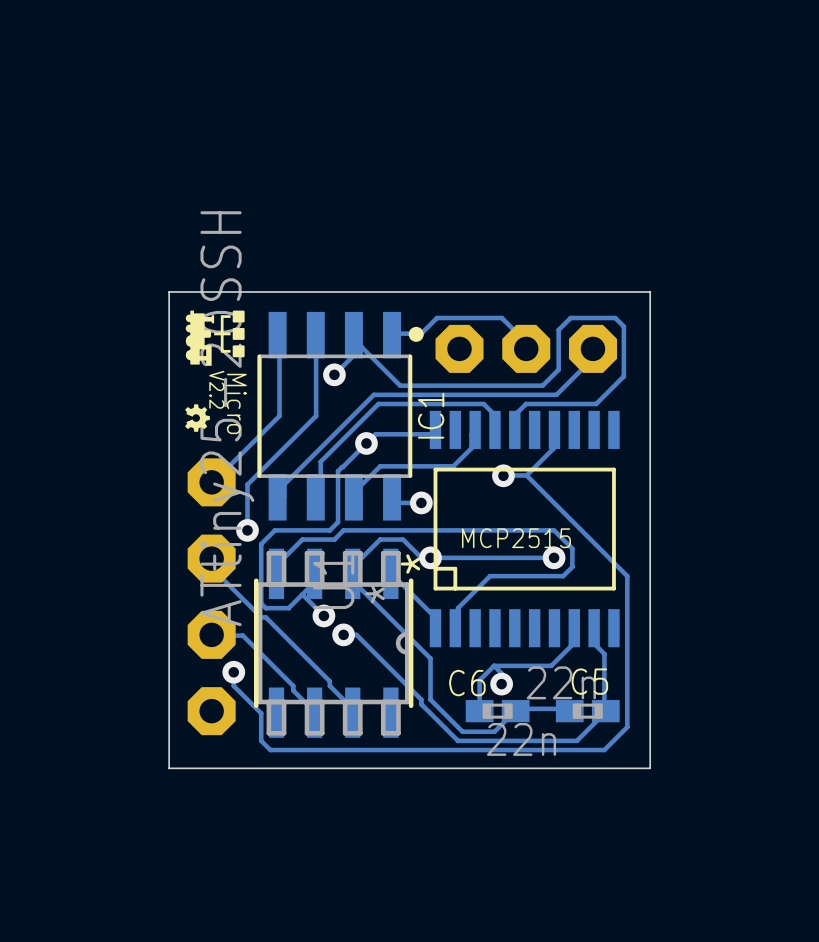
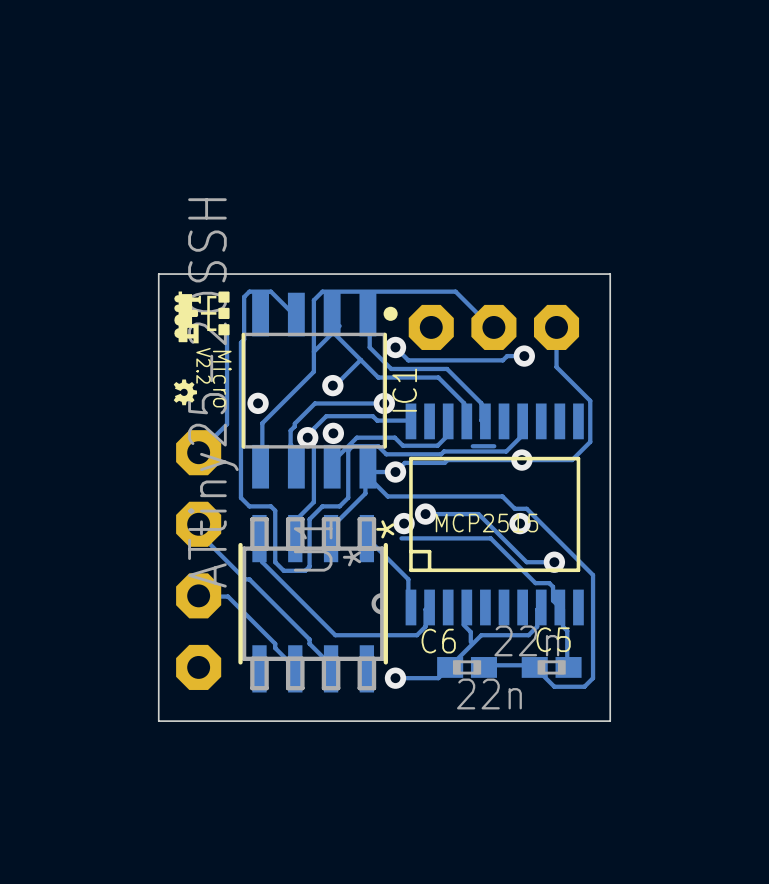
track: (277, 335) (279, 351) (279, 416) (211, 482) -> (227, 330) (227, 424) (198, 452)
track: (316, 335) (316, 416) (247, 484) (247, 530) -> none
track: (392, 335) (421, 333) (437, 318) (501, 318) (523, 339) (526, 348) -> (259, 475) (262, 472) (262, 423) (313, 371) (313, 300) (322, 291) (455, 291) (489, 326) (493, 327)
track: none -> (294, 322) (292, 321) (292, 313) (270, 291) (249, 291) (244, 296) (244, 339) (240, 342) (240, 497) (249, 506) (270, 506) (275, 510) (275, 562) (283, 570) (305, 570) (309, 566) (309, 519) (322, 506) (339, 506) (348, 497) (348, 450) (352, 446) (378, 446) (386, 454) (506, 451) (522, 435) (522, 421)
track: none -> (330, 322) (326, 326) (378, 377) (438, 377) (464, 403) (464, 420) (466, 421)
track: (358, 344) (353, 335) (351, 336) (400, 385) (542, 385) (558, 369) (558, 329) (570, 318) (615, 318) (623, 326) (623, 376) (596, 403) (526, 403) (517, 412) (517, 429) (514, 429) -> none
track: none -> (366, 322) (369, 326) (369, 347) (391, 368) (447, 368) (481, 403) (481, 420) (485, 421)
track: (592, 358) (556, 394) (373, 394) (284, 484) (284, 497) (277, 497) -> (556, 336) (556, 367) (590, 400) (590, 441) (572, 460) (447, 460) (444, 462) (404, 462) (393, 475)
track: none -> (395, 347) (408, 360) (502, 360) (507, 356) (524, 356)
via: none -> (395, 347)
via: (334, 374) -> none
via: none -> (524, 356)
track: none -> (360, 359) (335, 385) (332, 385)
via: none -> (332, 385)
via: none -> (258, 403)
track: none -> (384, 403) (314, 403) (294, 423) (290, 430) (290, 444) (294, 448) (294, 475)
via: none -> (384, 403)
track: (435, 429) (435, 434) (375, 434) (338, 471) (338, 522) (329, 530) (274, 530) (261, 544) (261, 603) (265, 608) (288, 608) (311, 585) (311, 576) (314, 573) -> (410, 421) (377, 420) (372, 416) (326, 416) (313, 428) (313, 502) (296, 519) (295, 538)
track: (475, 429) (471, 434) (471, 448) (453, 466) (420, 466) -> (448, 421) (447, 436) (437, 445) (402, 445) (394, 437)
track: (494, 429) (494, 414) (483, 403) (378, 403) (320, 461) (320, 497) (315, 497) -> none
track: (554, 429) (554, 448) (526, 475) (627, 576) (627, 727) -> none
via position: (366, 443) -> (333, 433)
via: none -> (307, 437)
via: (503, 475) -> none
via: none -> (521, 460)
part position: (524, 529) -> (494, 514)
via: (247, 530) -> none
track: none -> (425, 514) (478, 514) (526, 562) (554, 562)
via: none -> (425, 514)
track: (554, 557) (421, 557) (403, 539) (380, 539) (352, 567) -> (588, 682) (593, 678) (593, 575) (526, 508) (514, 508) (502, 496) (387, 496) (366, 475) (365, 493) (331, 527) (331, 532)
track: (276, 573) (279, 571) (279, 562) (302, 539) (334, 539) (343, 530) (554, 530) (572, 548) (572, 567) (563, 576) (490, 576) (457, 608) (457, 626) (455, 628) -> (259, 538) (262, 540) (262, 562) (335, 635) (416, 635) (425, 626) (425, 609) (429, 607)
track: (352, 573) (352, 580) (430, 658) (430, 699) (462, 731) (494, 731) (515, 711) -> none
track: (302, 594) (323, 615) -> none
via: none -> (554, 562)
via: (323, 615) -> none
track: (574, 628) (572, 631) (572, 644) (551, 665) (494, 665) (479, 680) (479, 711) -> none
track: (594, 628) (595, 644) (604, 653) (604, 672) -> (401, 538) (490, 538) (535, 583) (549, 583) (553, 586) (553, 600) (562, 609) (562, 626) (567, 630)
track: (343, 634) (356, 634) (421, 699) (421, 704) (457, 740) (576, 740) (605, 711) -> none
via: (343, 634) -> none
track: none -> (541, 607) (537, 609) (537, 626) (528, 635) (481, 635) (438, 678) (395, 678)
track: (233, 672) (233, 685) (261, 713) (261, 740) (270, 750) (604, 750) (622, 731) -> (534, 667) (554, 686) (584, 686)
via: (233, 672) -> none
via: (501, 684) -> none
via: none -> (395, 678)

